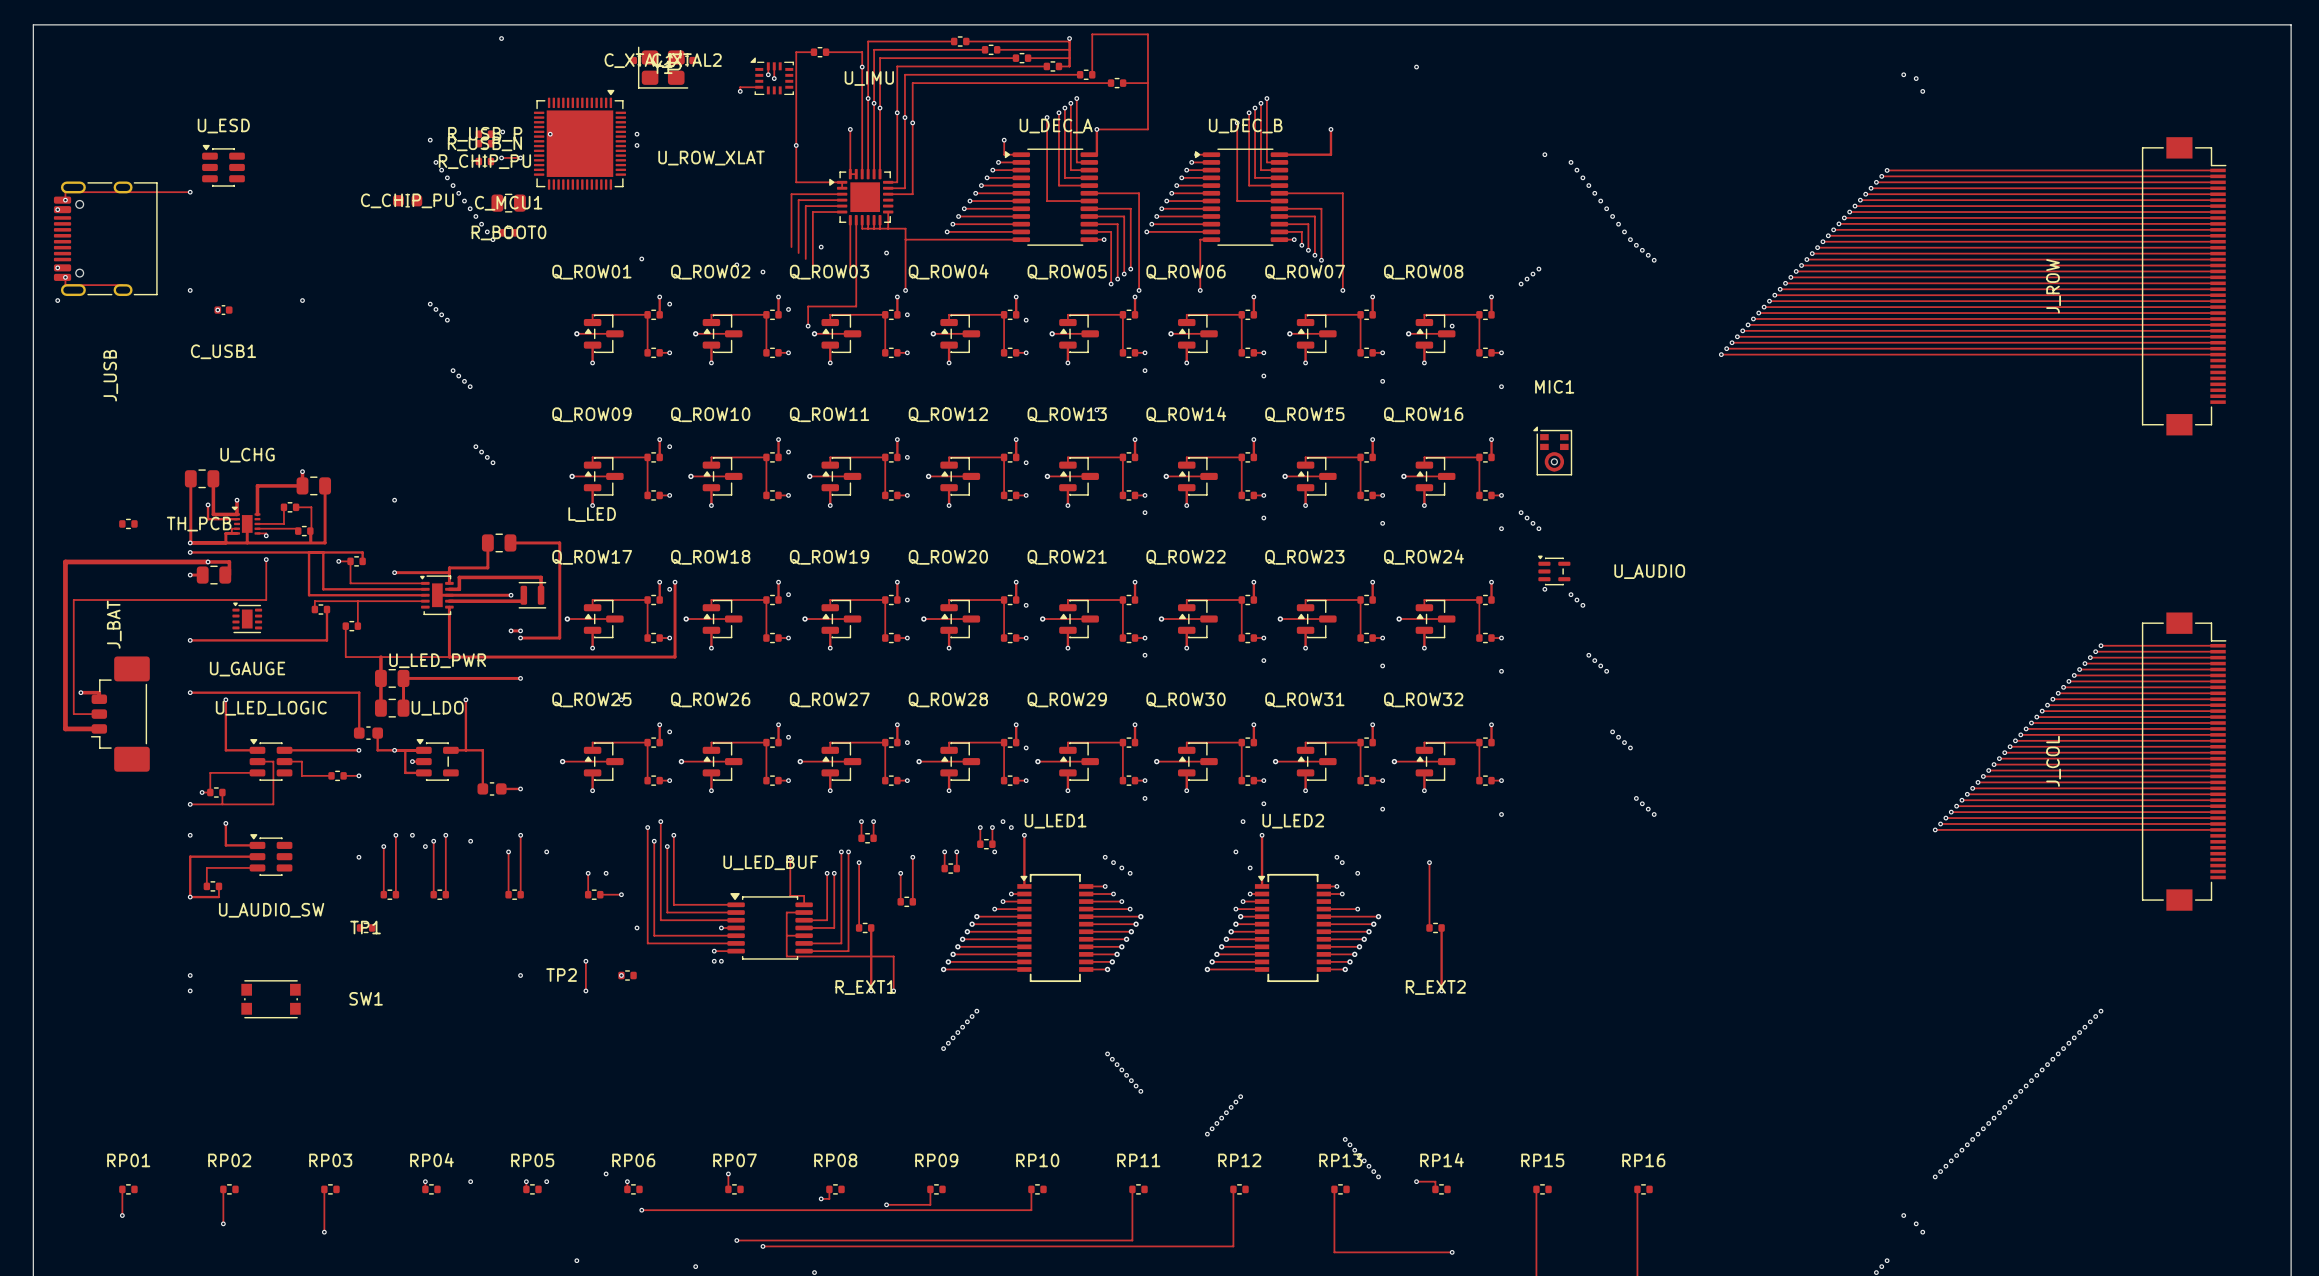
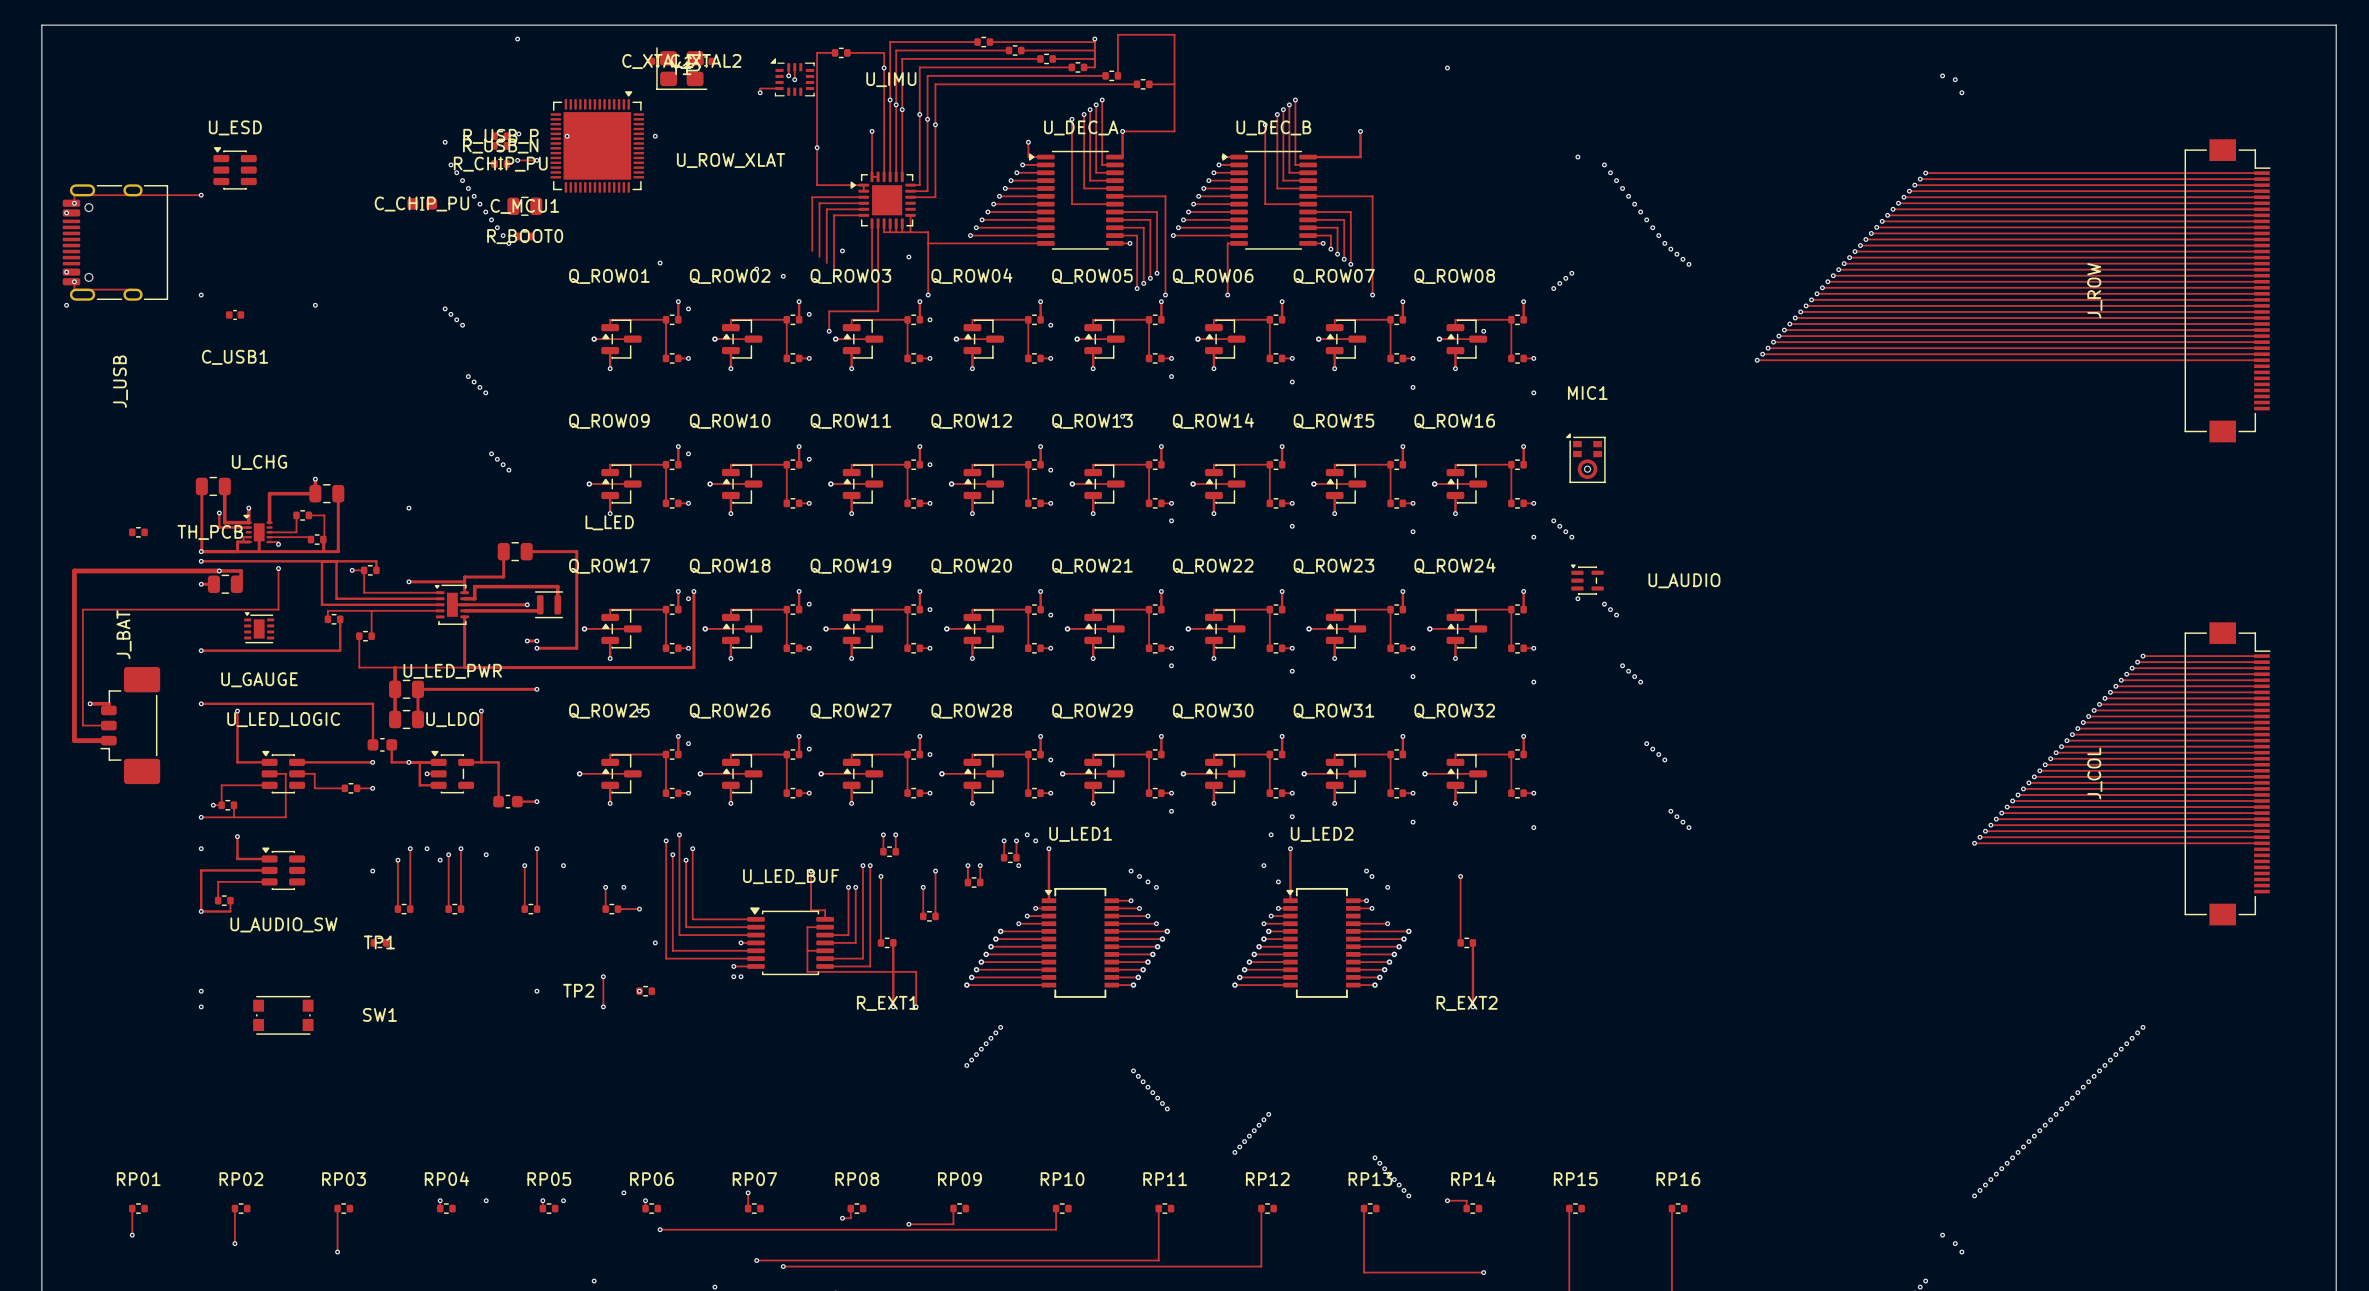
via: (637, 145) -> none
via: (217, 310) -> none

